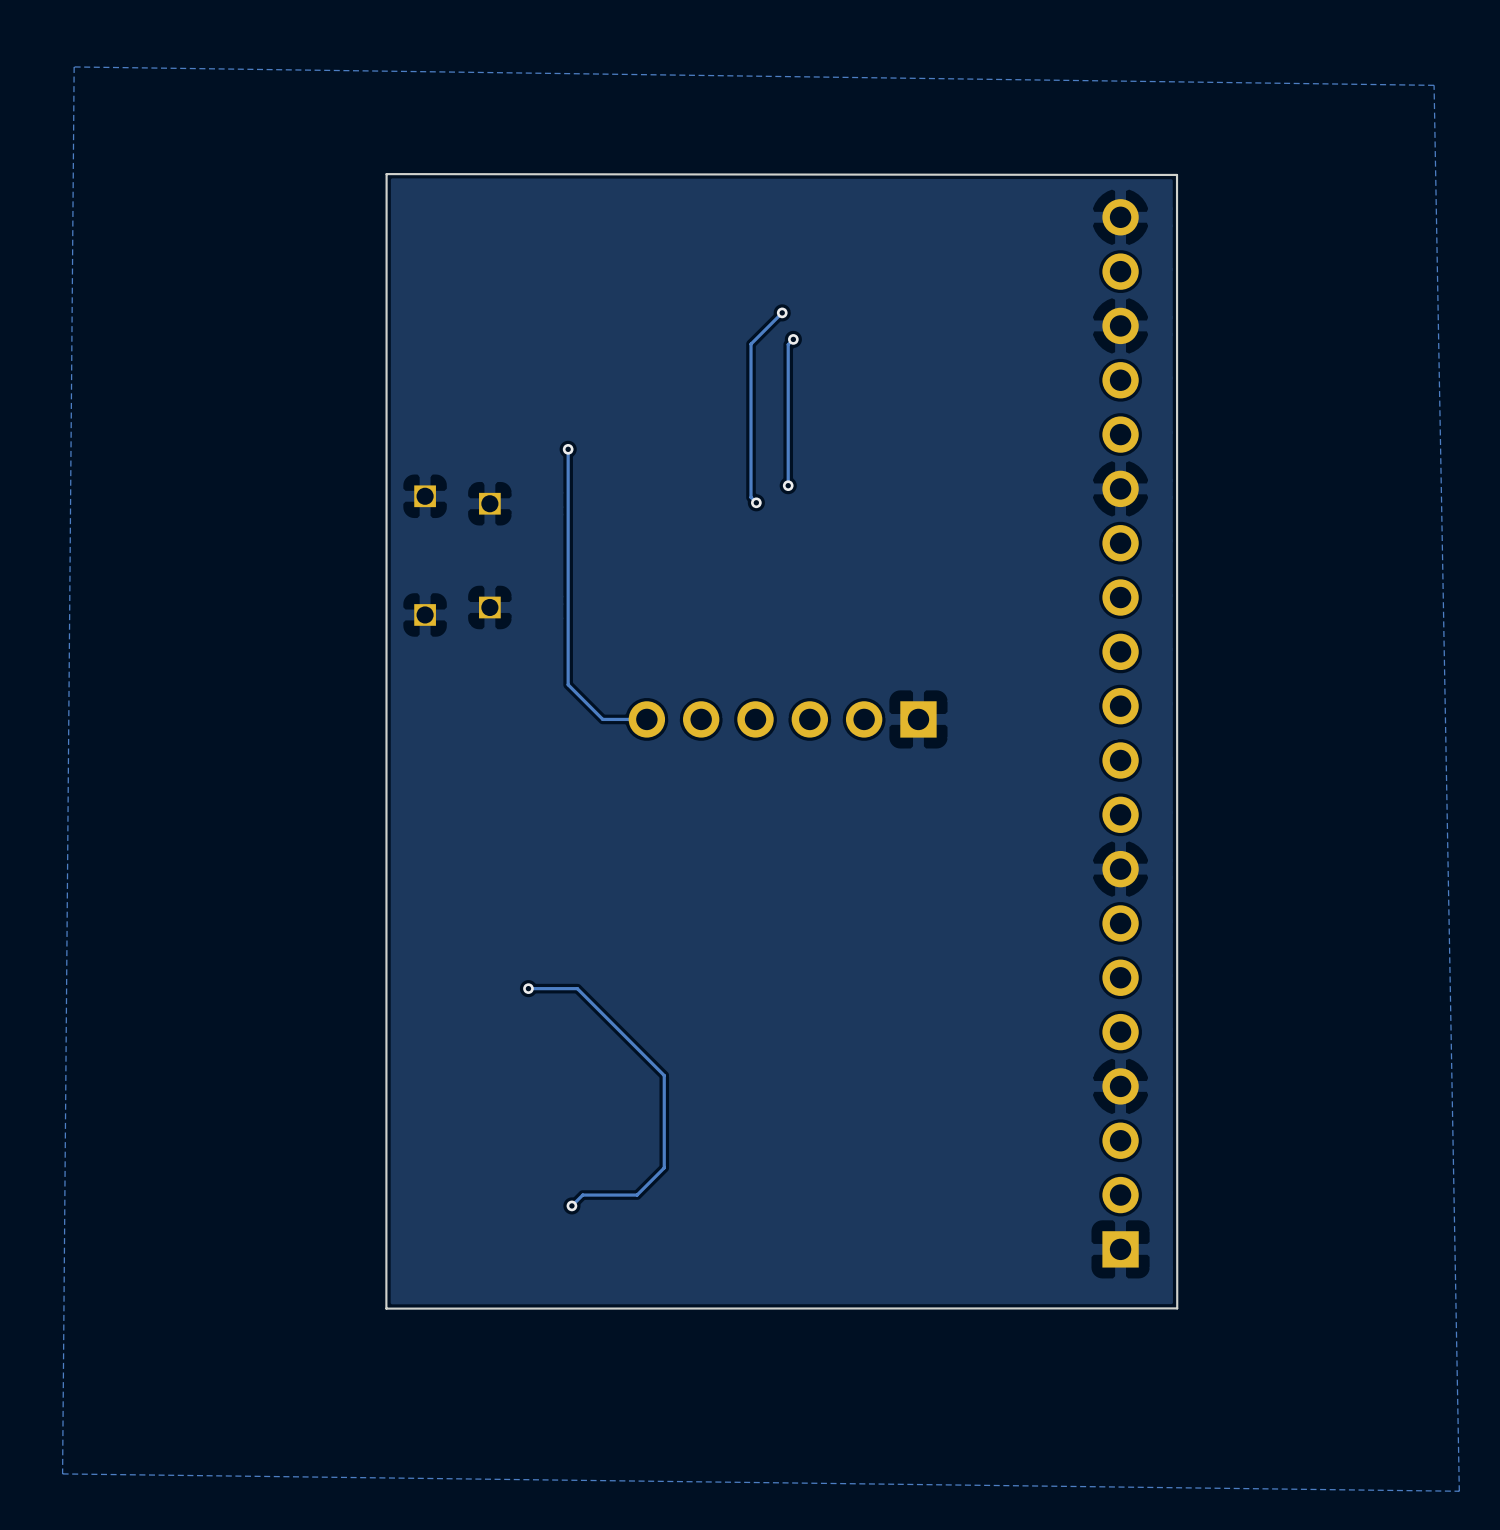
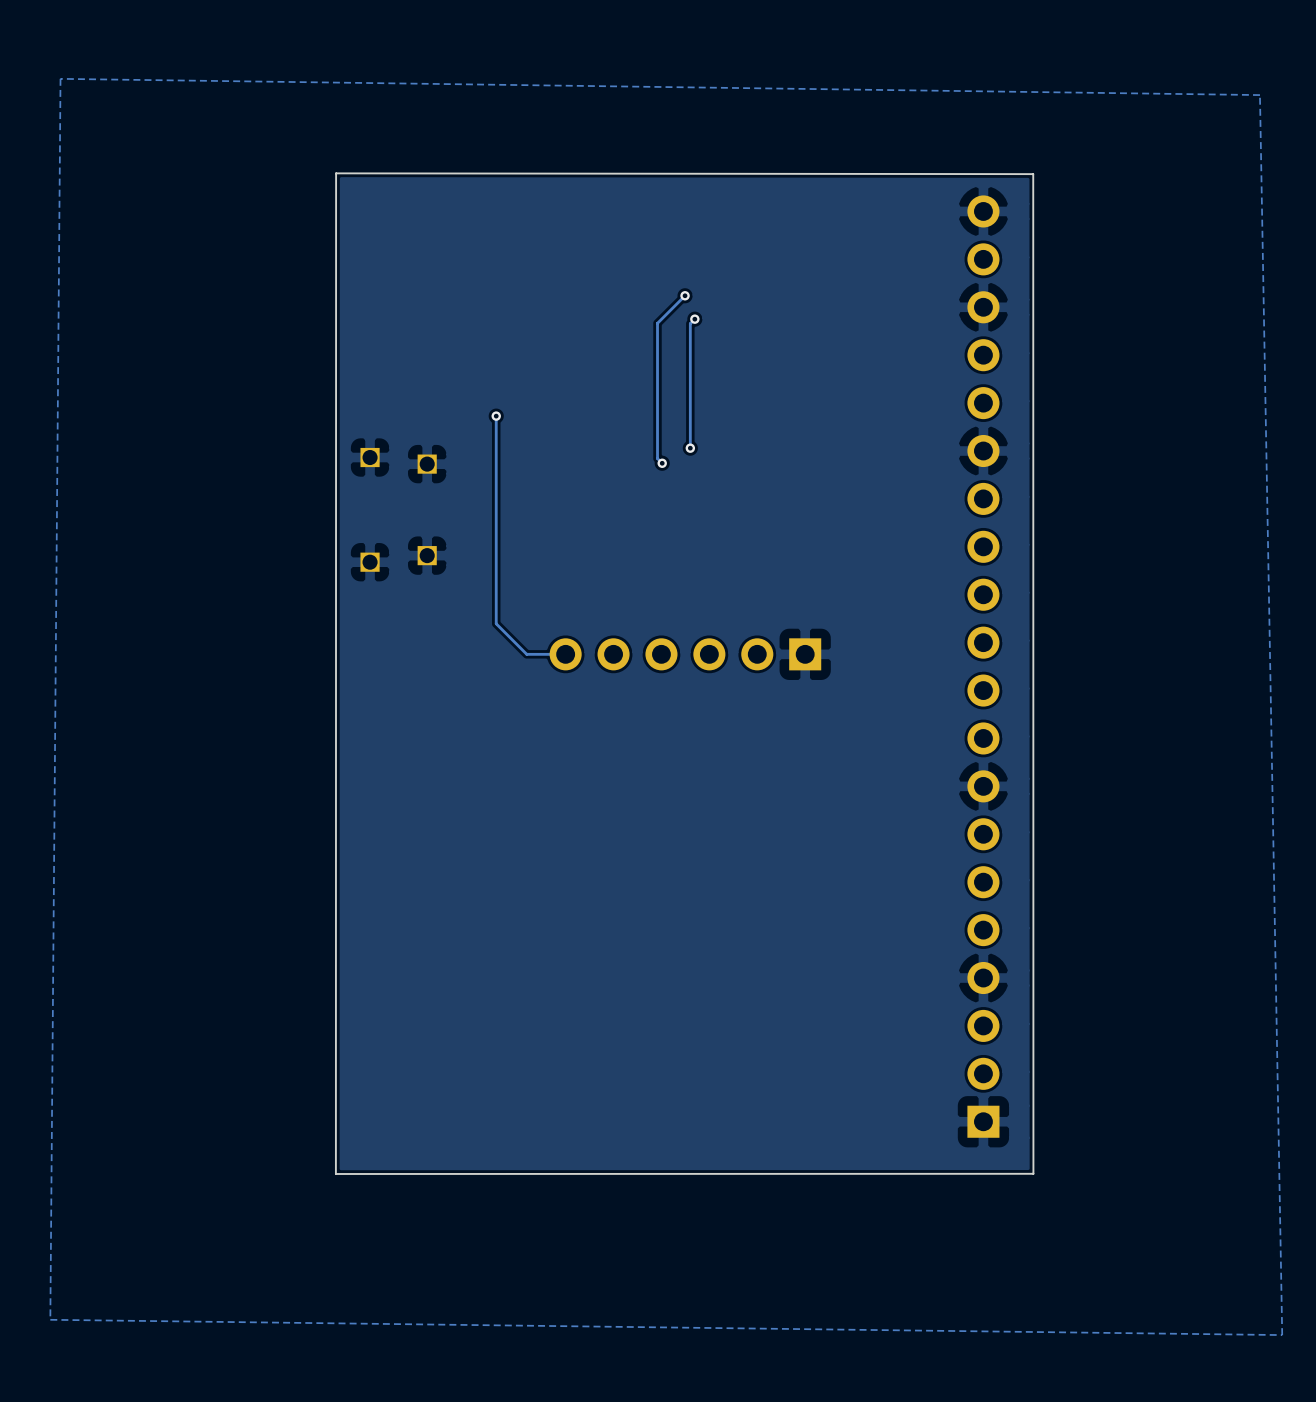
track: (528, 988) (577, 988) (664, 1075) (664, 1167) (637, 1195) (582, 1195) (571, 1205) -> none
via: (528, 988) -> none
via: (571, 1205) -> none

